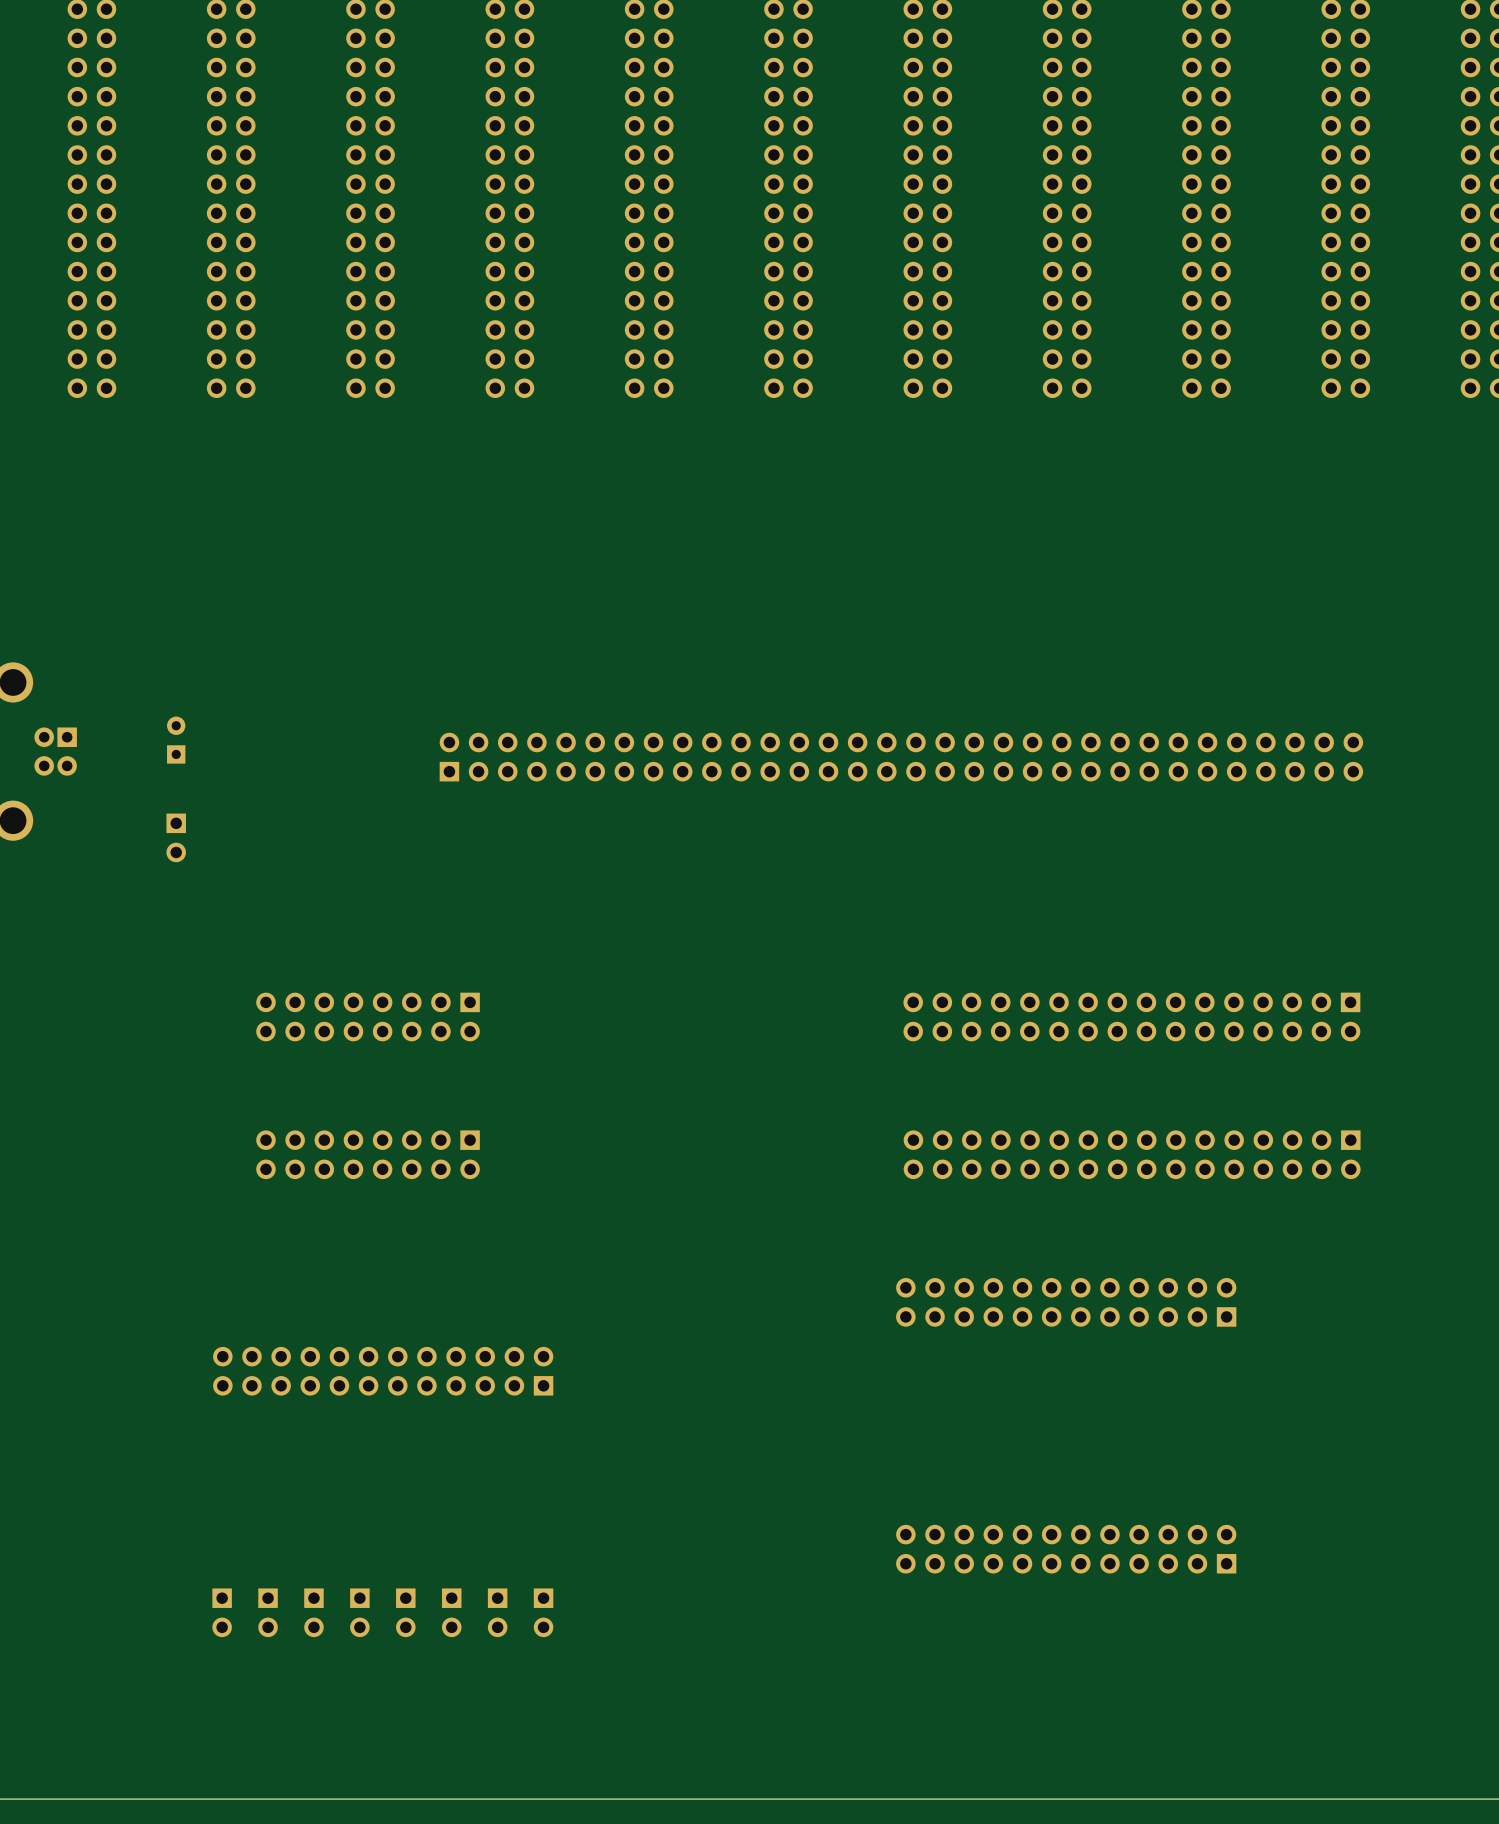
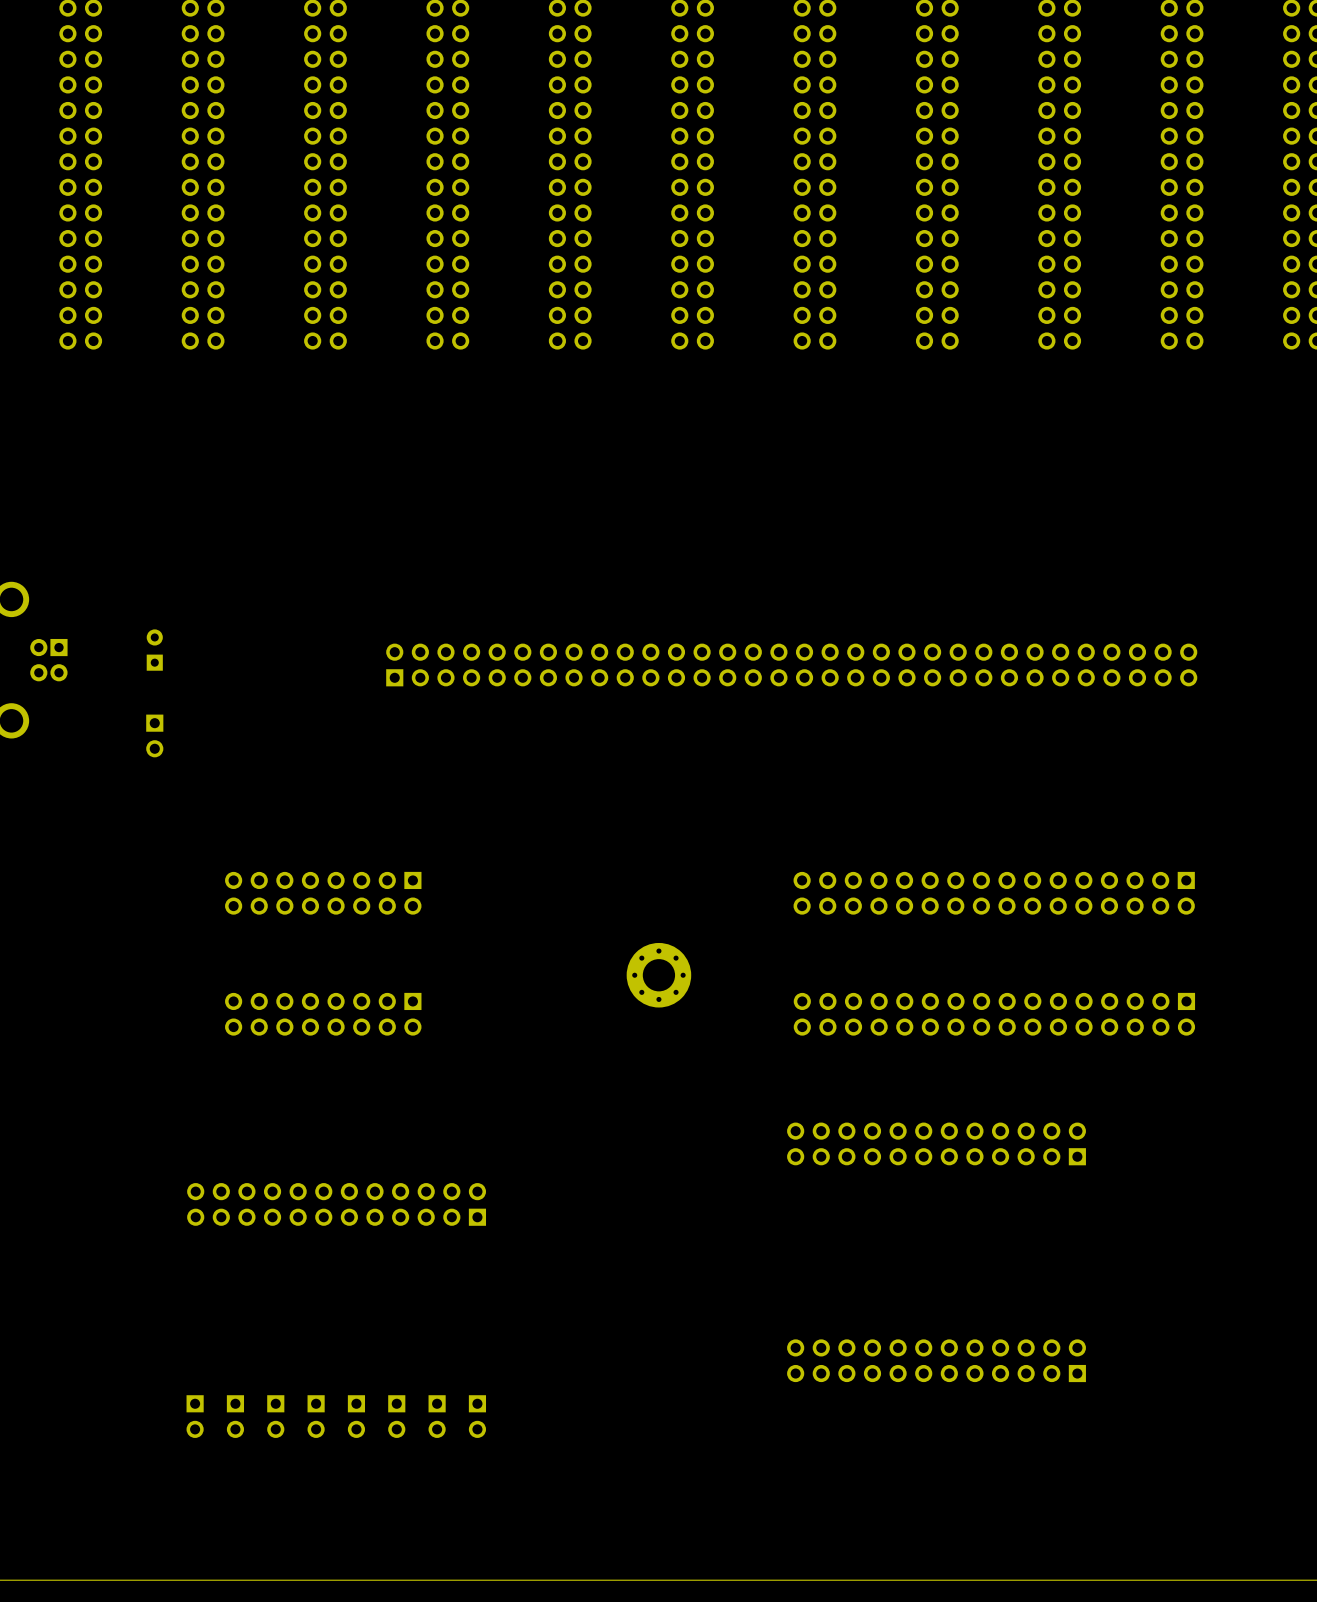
part: none -> (658, 975)

